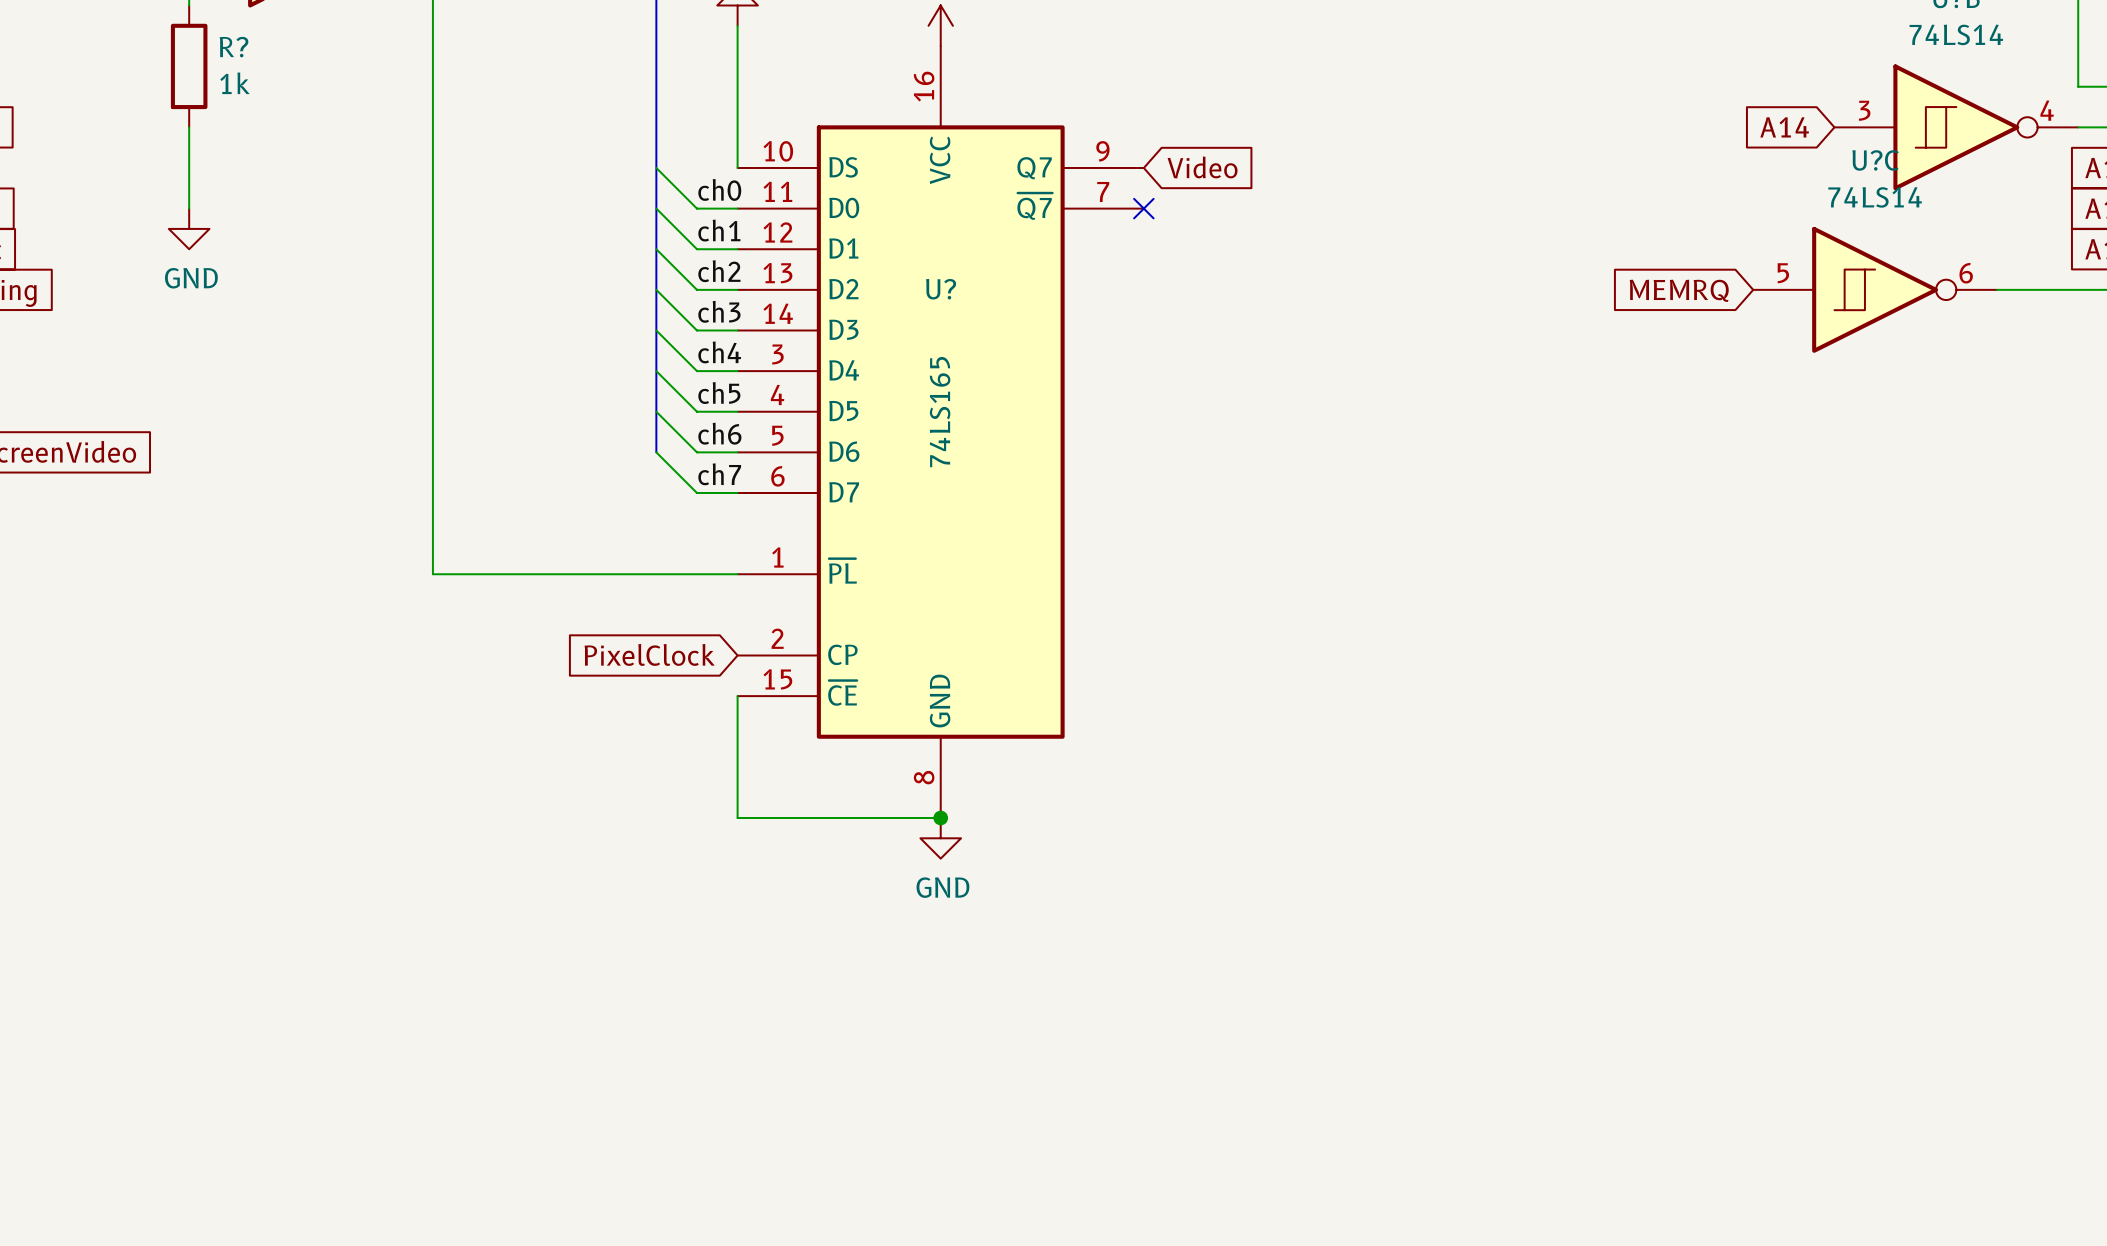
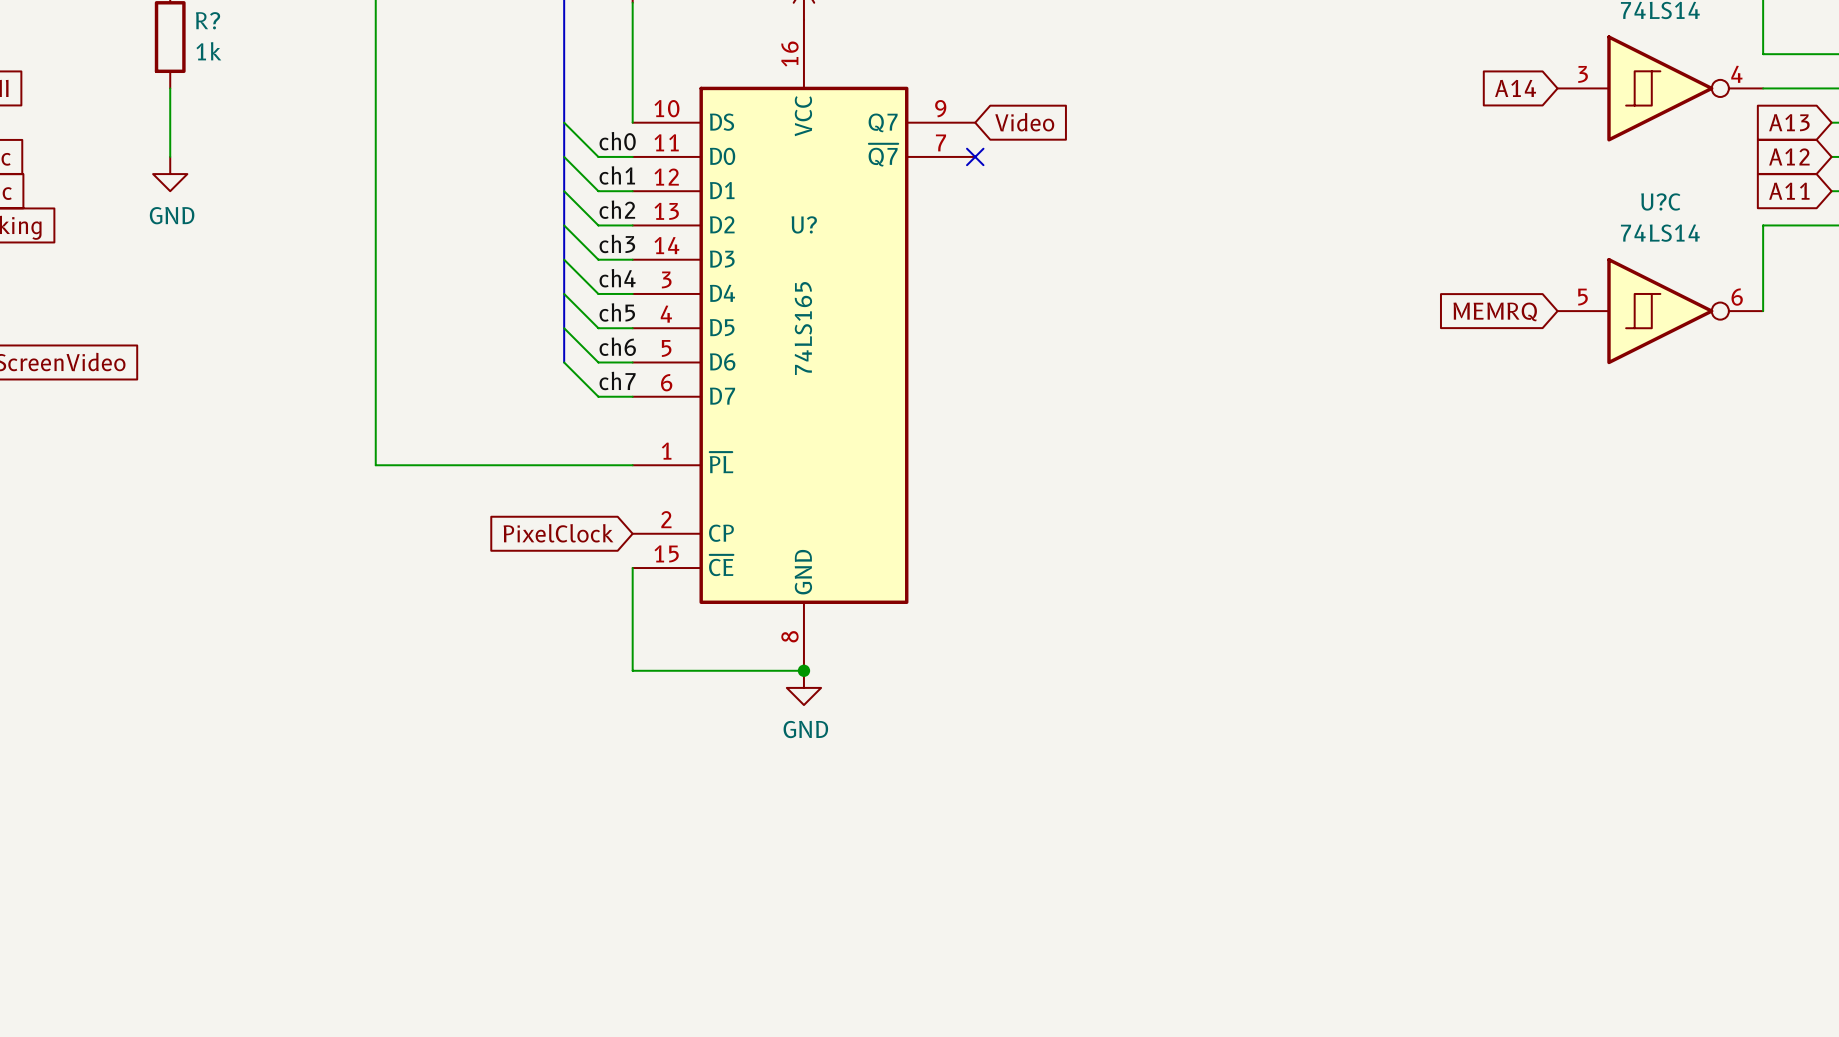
U?C position: (1875, 289) -> (1660, 311)
wire: (1996, 289) (2078, 289) -> (1763, 311) (1763, 225)
global label position: MEMRQ (1679, 290) -> MEMRQ (1495, 311)

